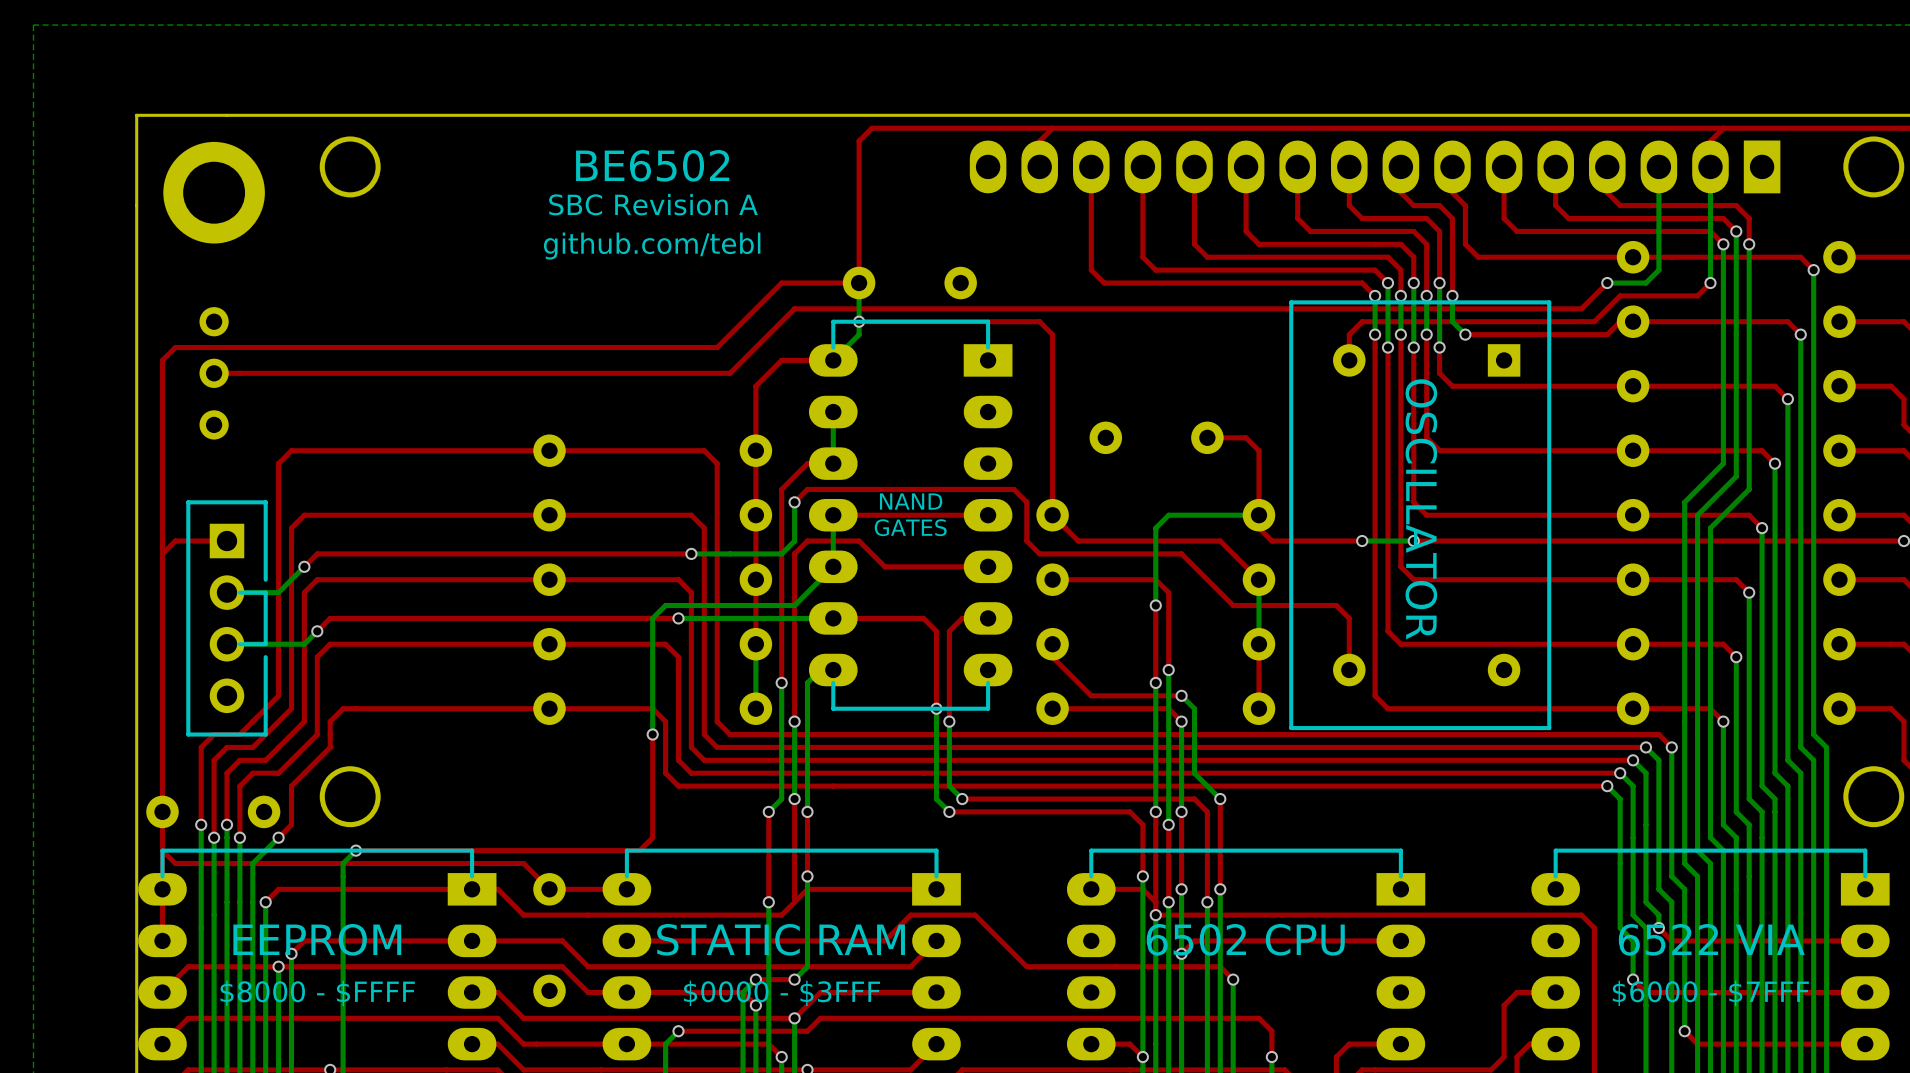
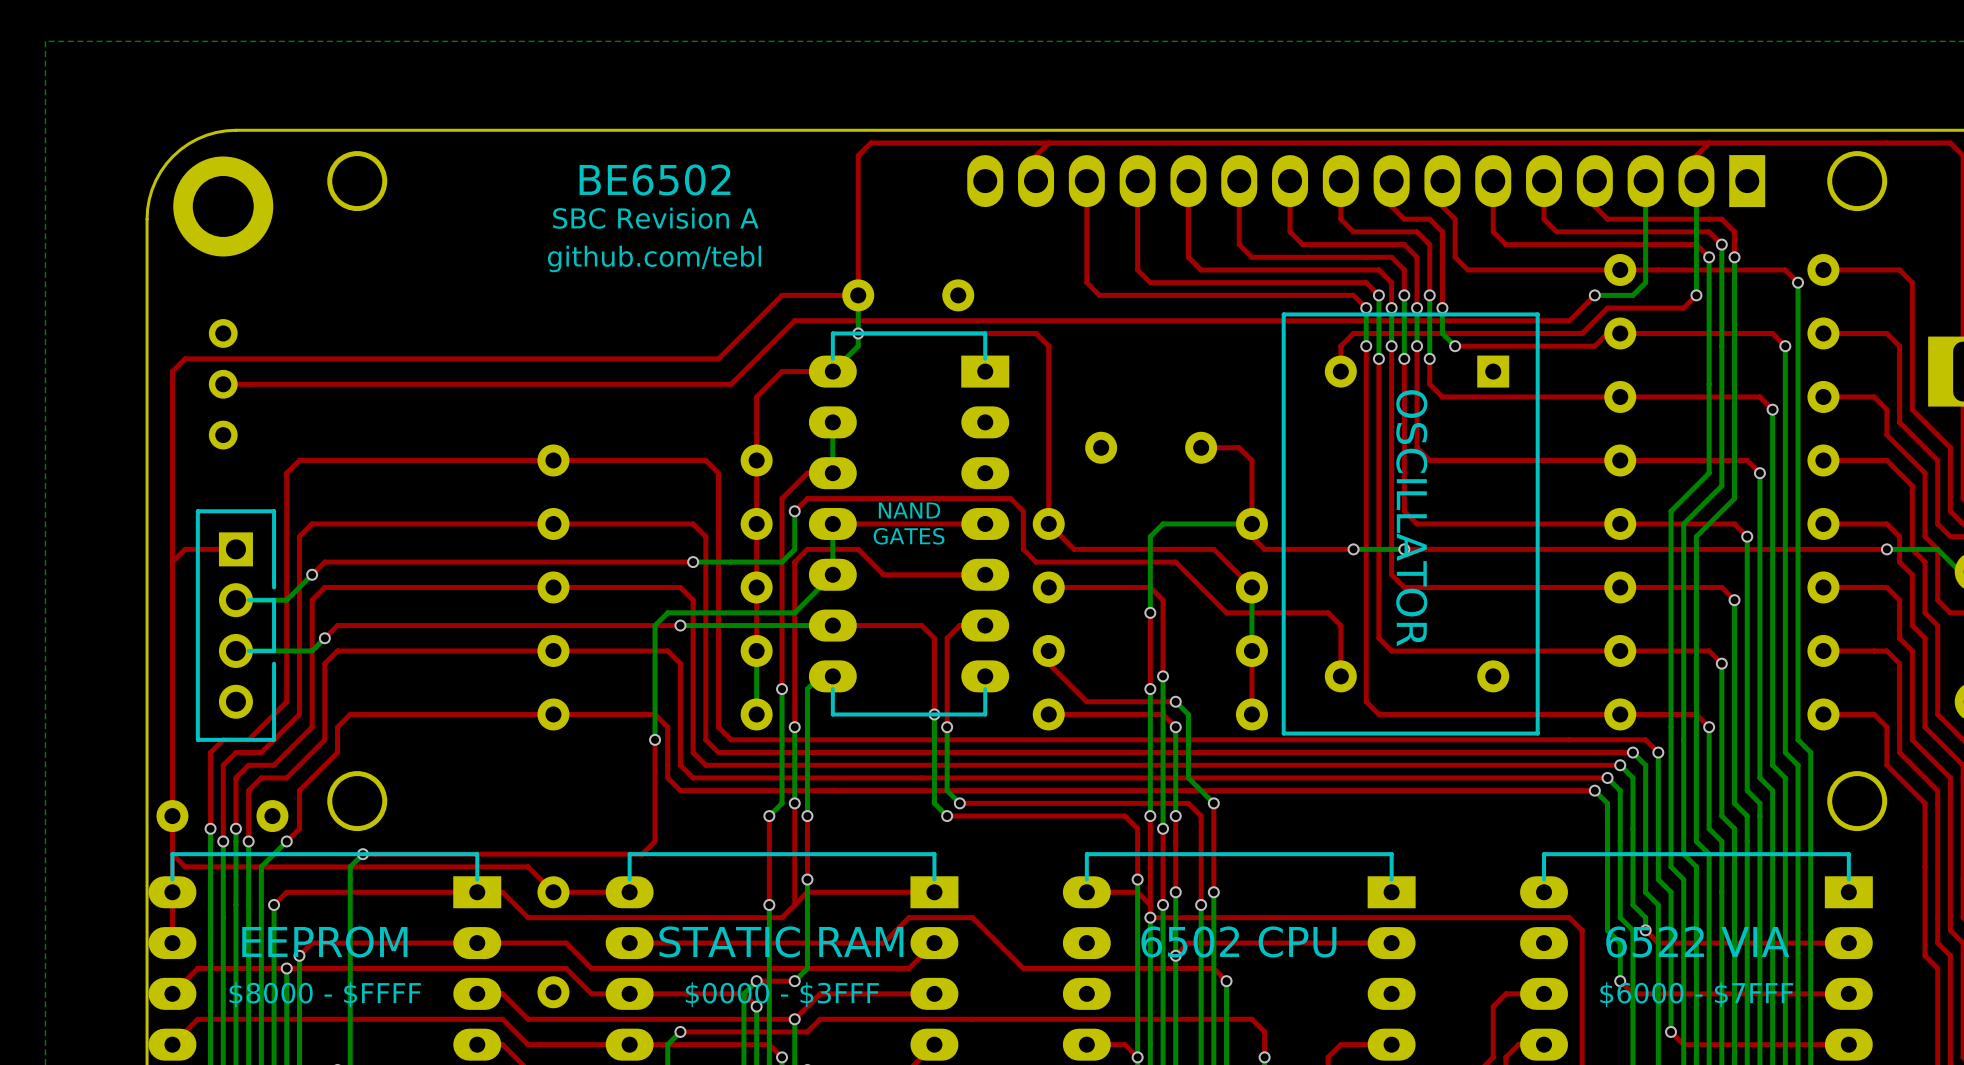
board edge: (227, 115) (136, 115) (136, 205) -> (235, 130) (206, 135) (188, 143) (173, 156) (155, 180) (149, 199) (147, 219)

